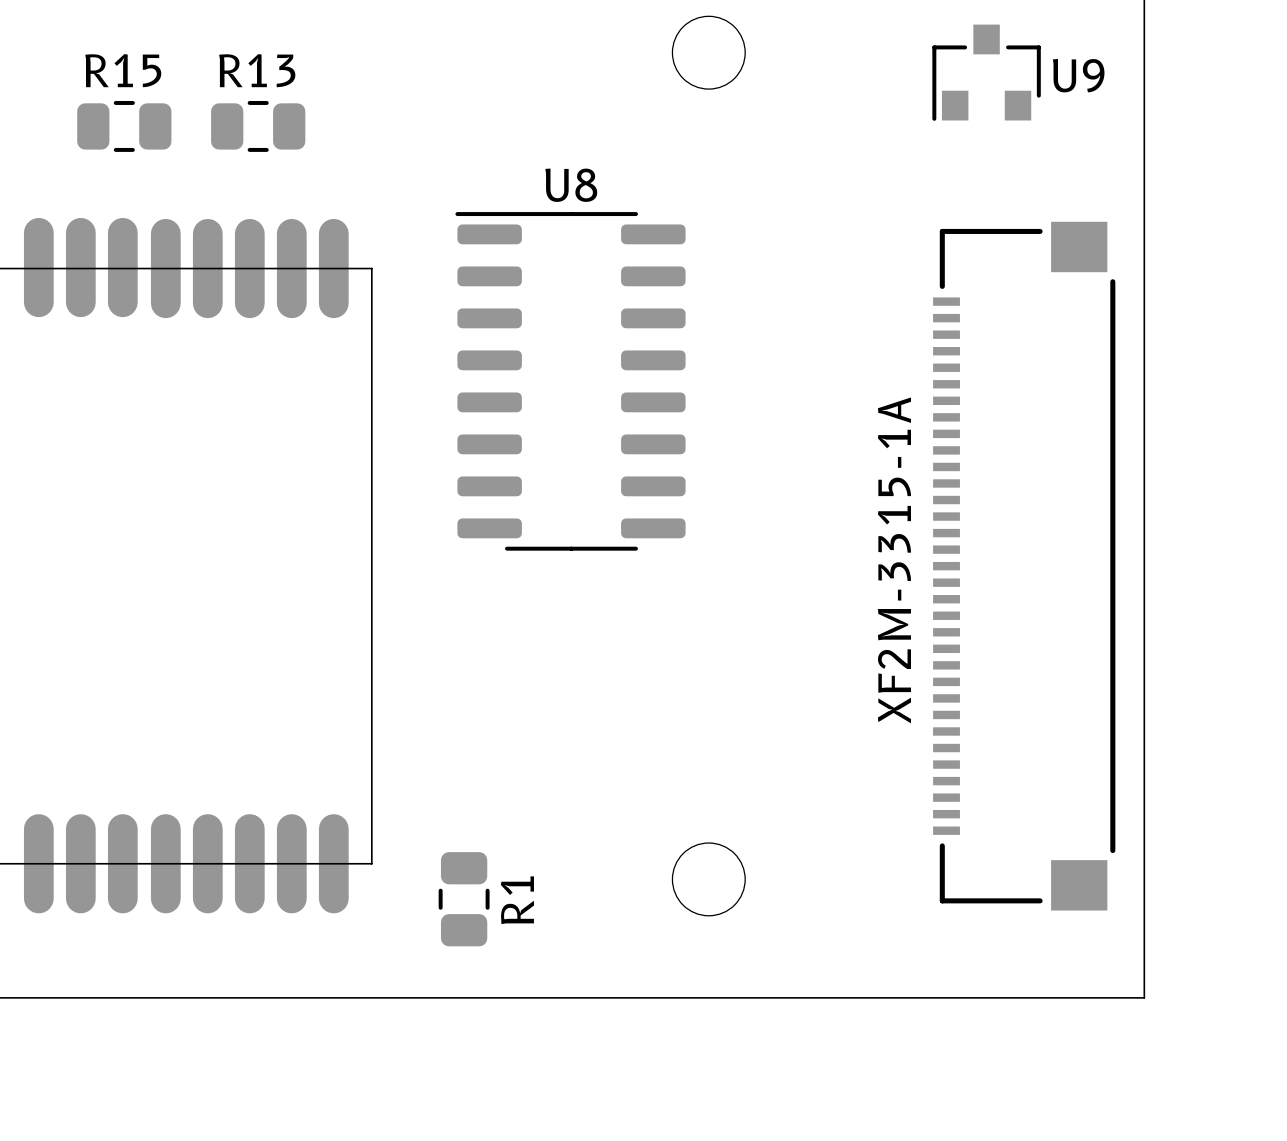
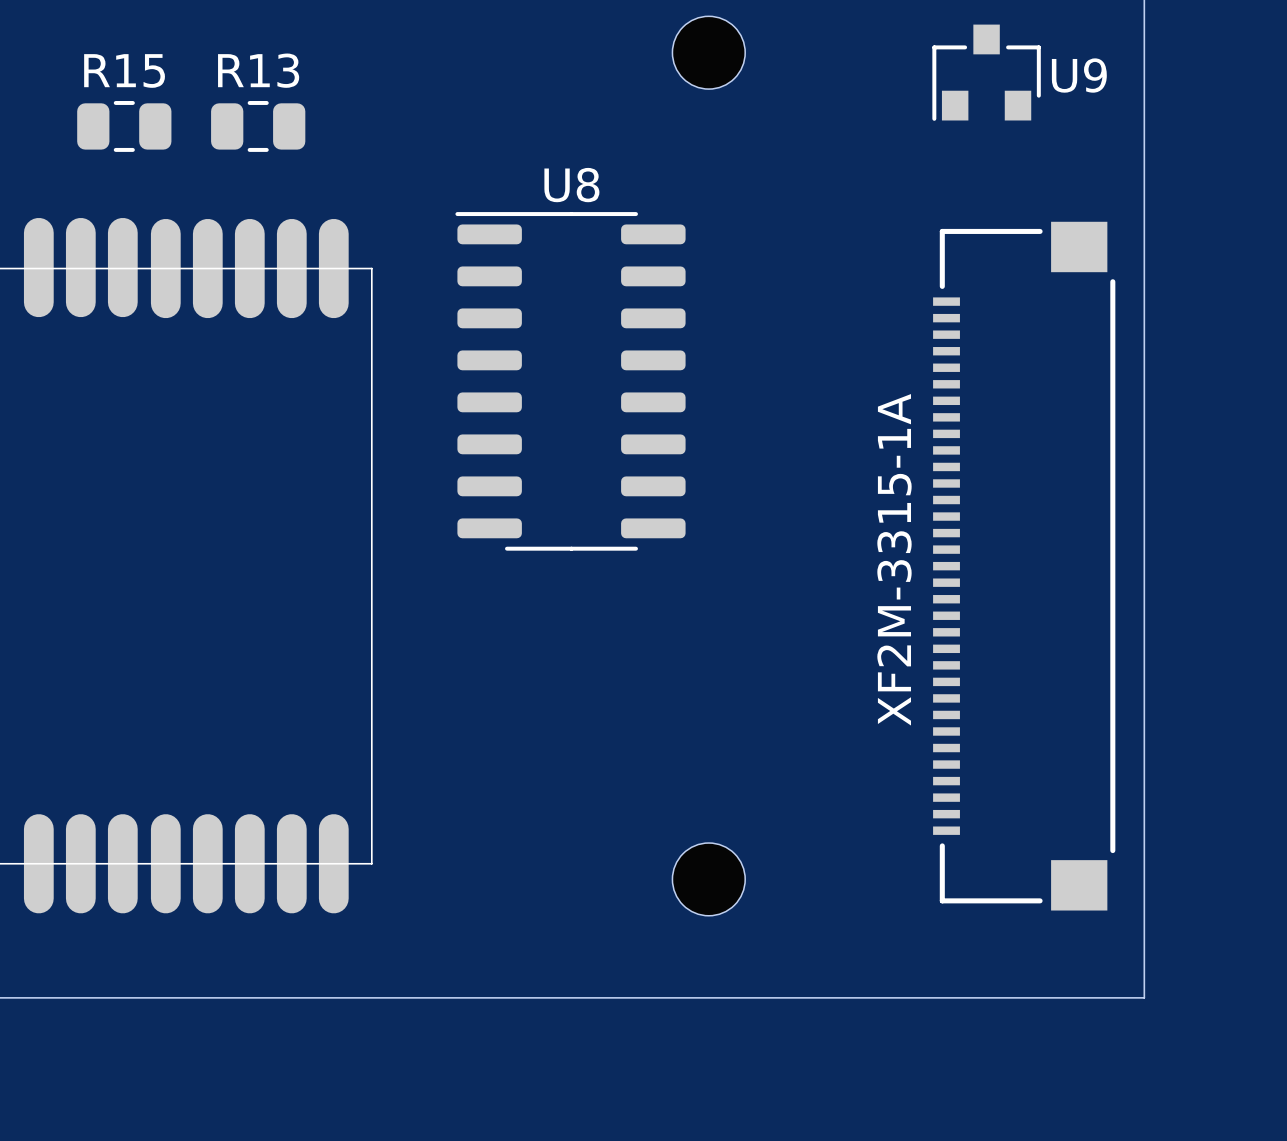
R1: (464, 899) -> none

